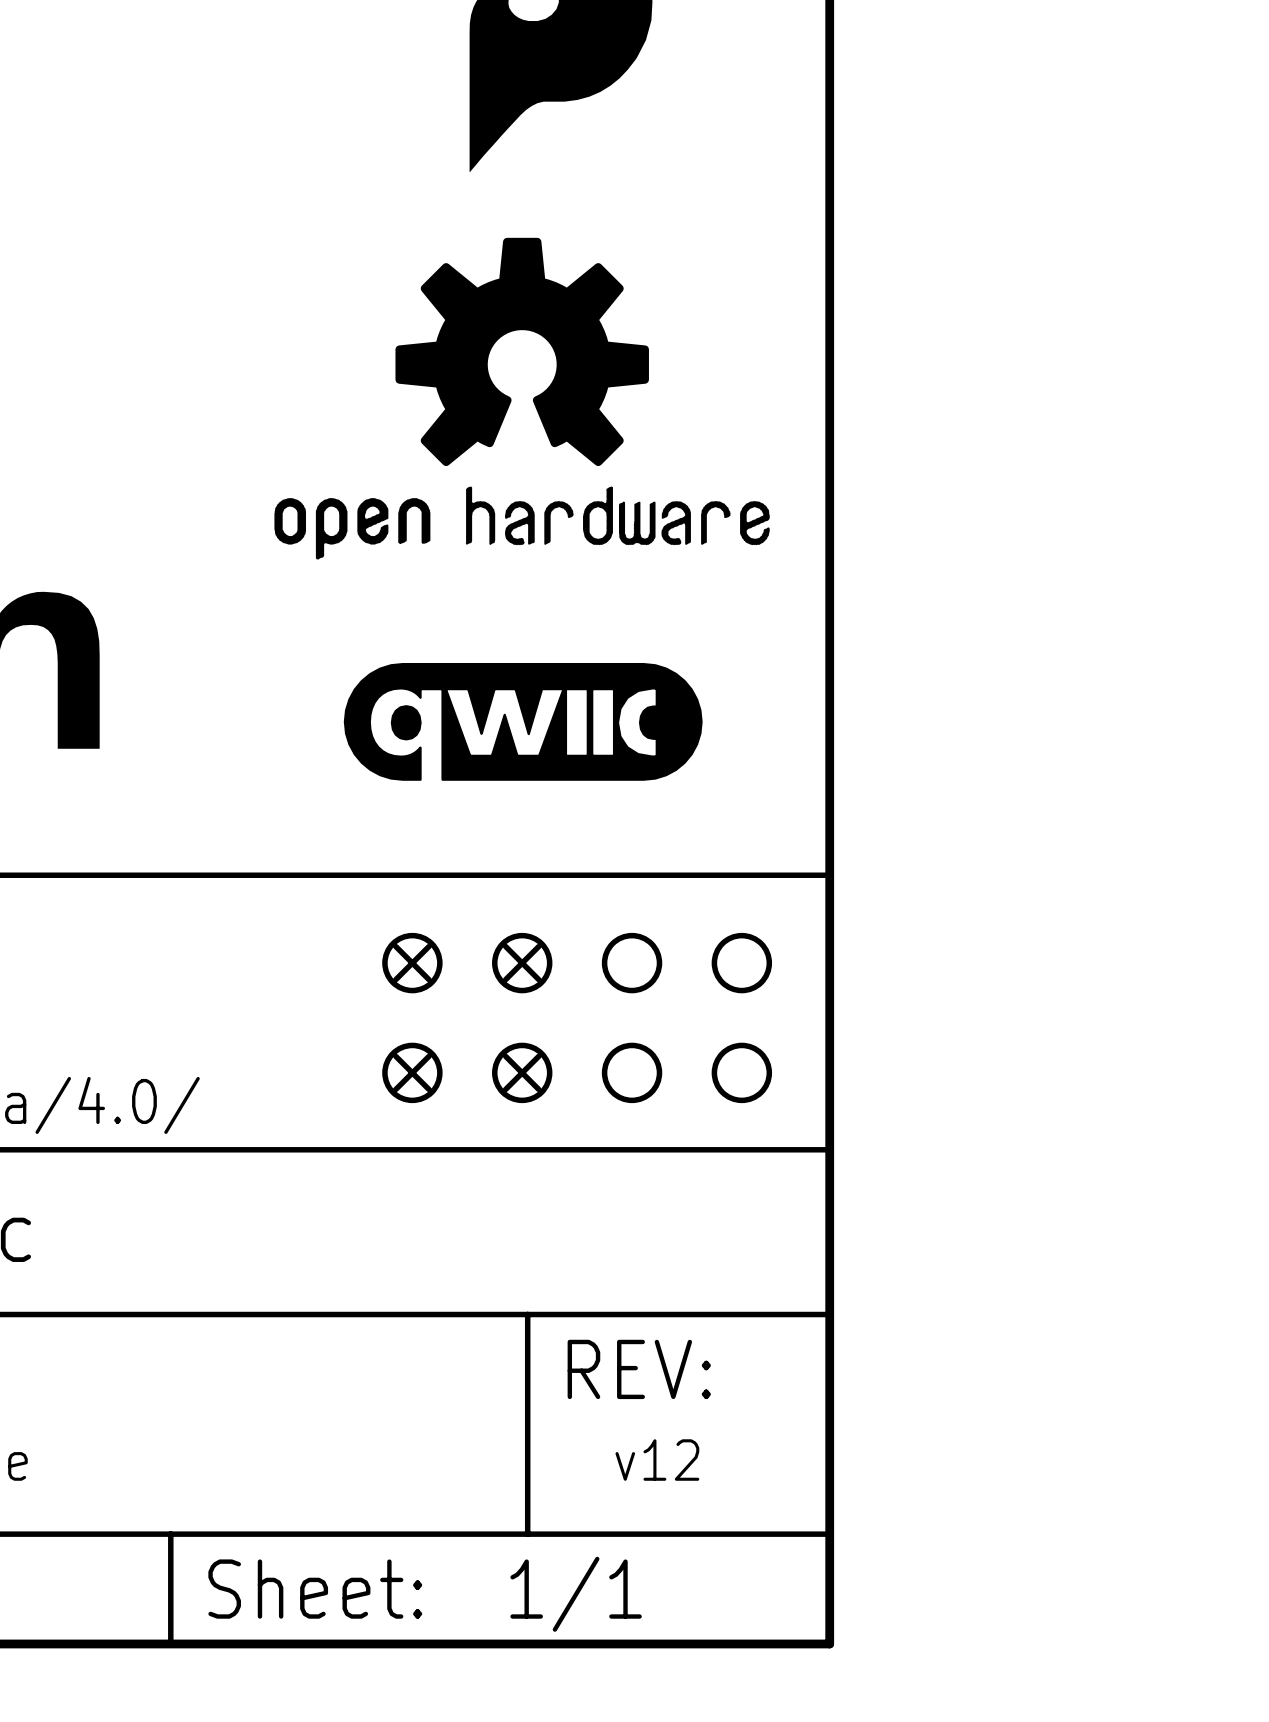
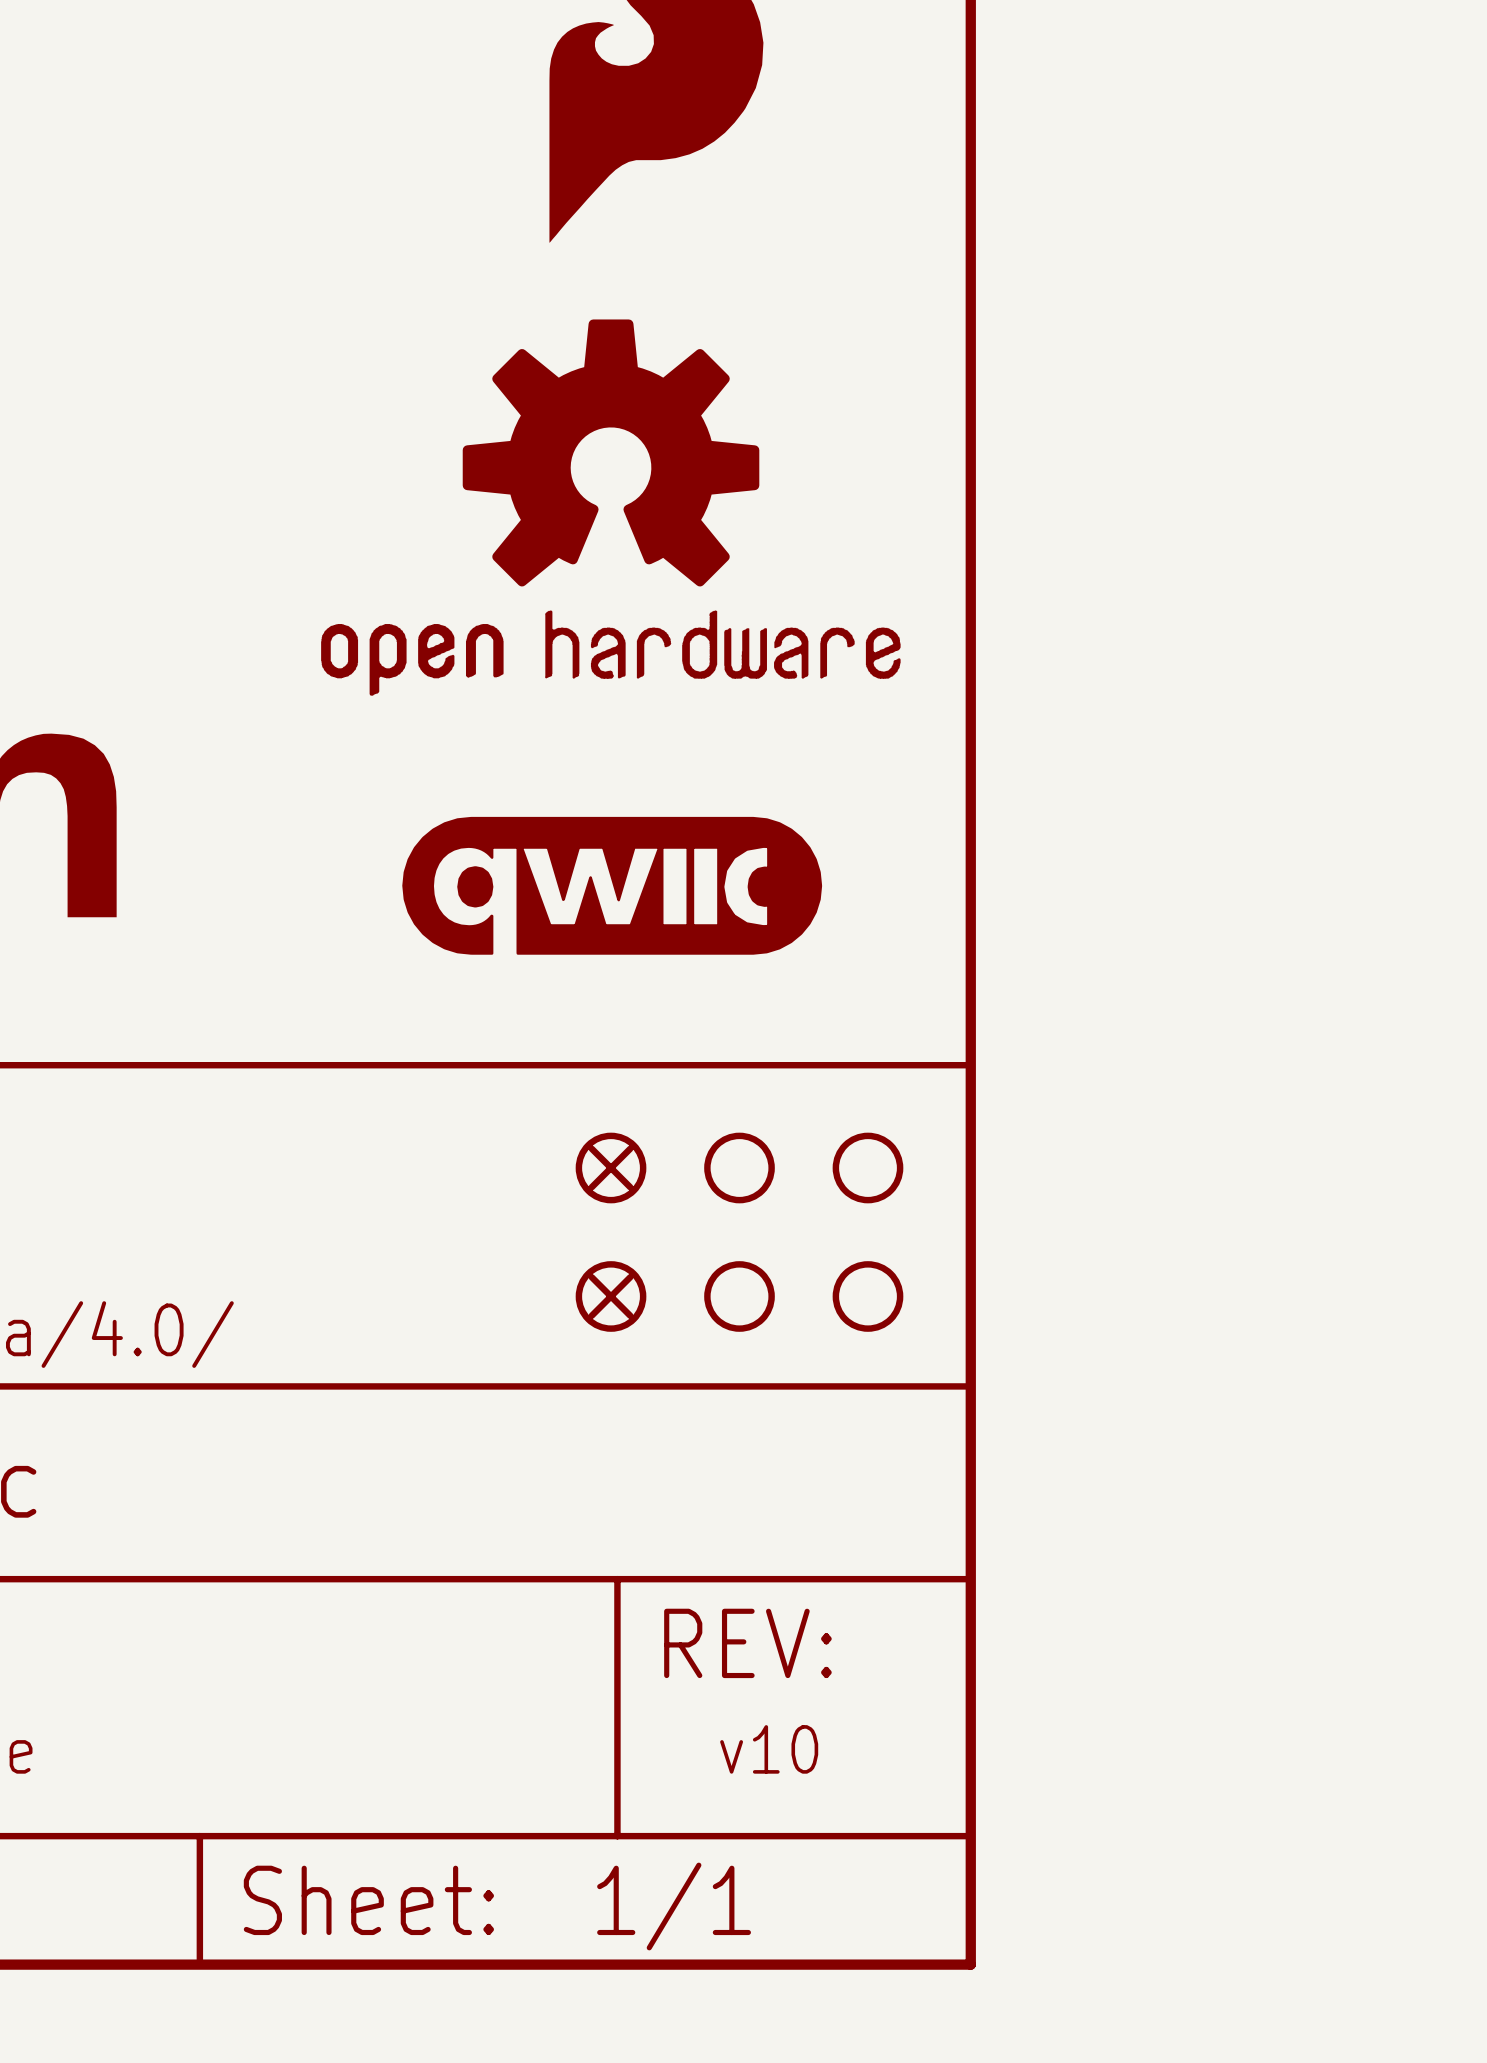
part: (412, 963) -> none
part: (412, 1072) -> none
text: v12 (657, 1460) -> v10 (769, 1749)

